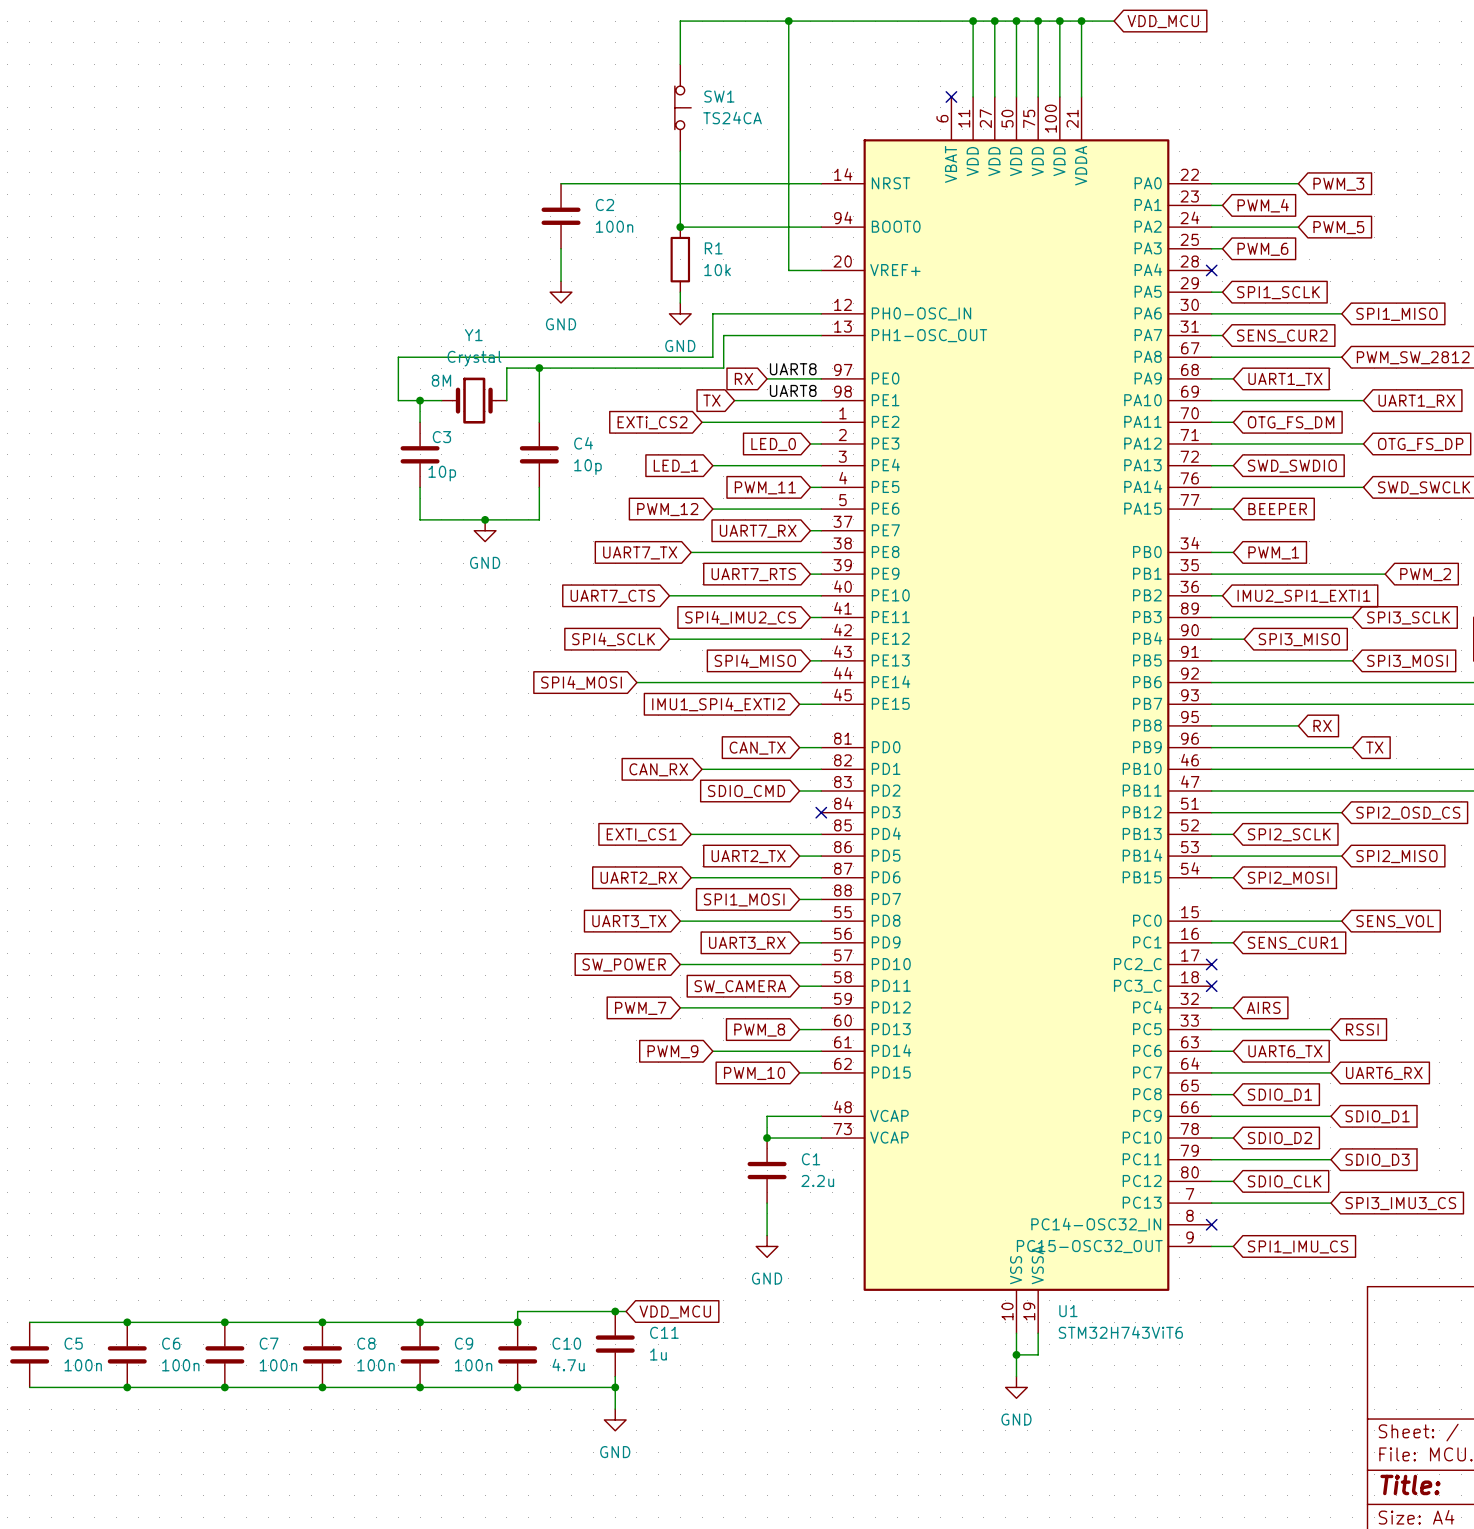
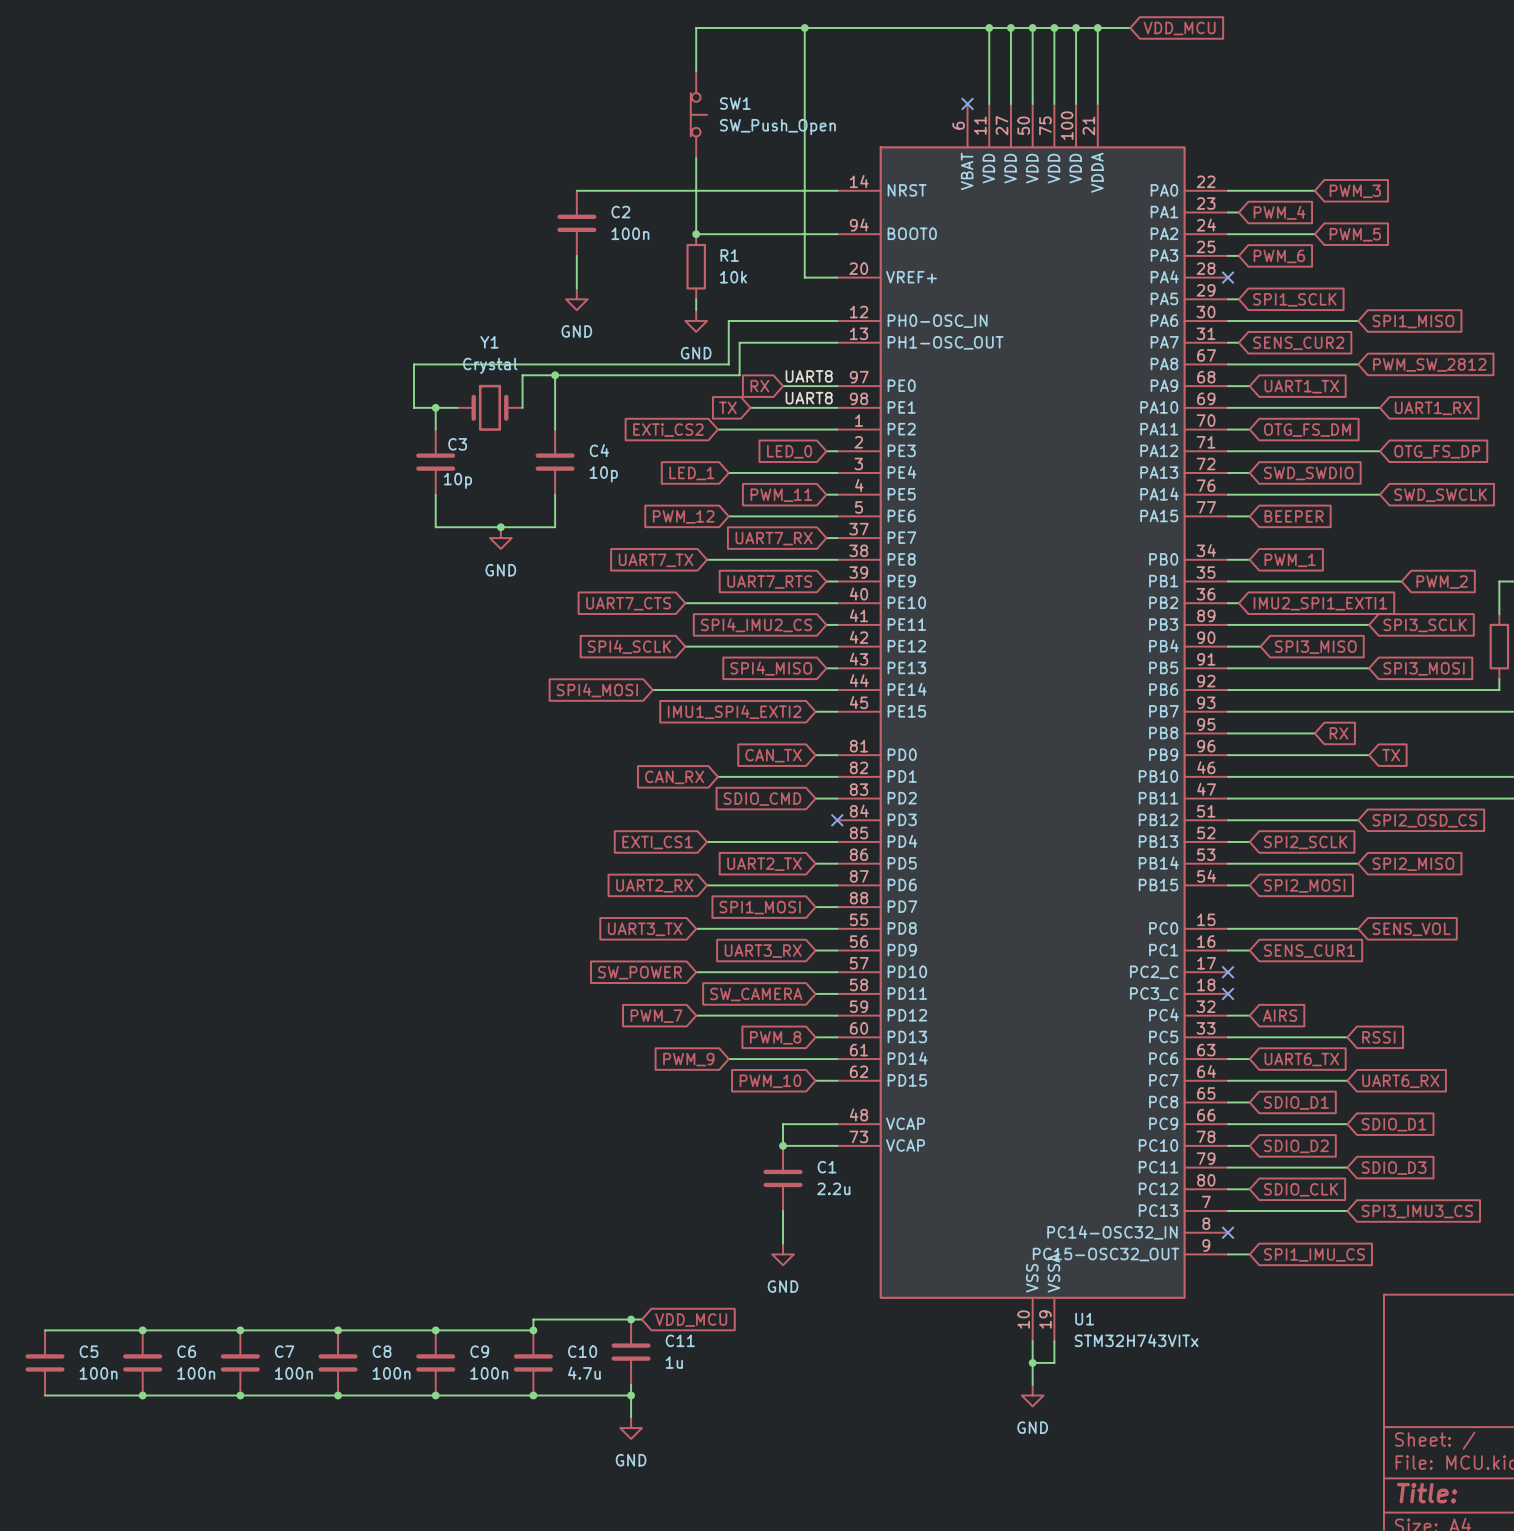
SW1 value: TS24CA (732, 118) -> SW_Push_Open (777, 127)
Y1 text: 8M (441, 380) -> none
U1 value: STM32H743ViT6 (1120, 1332) -> STM32H743VITx (1136, 1340)

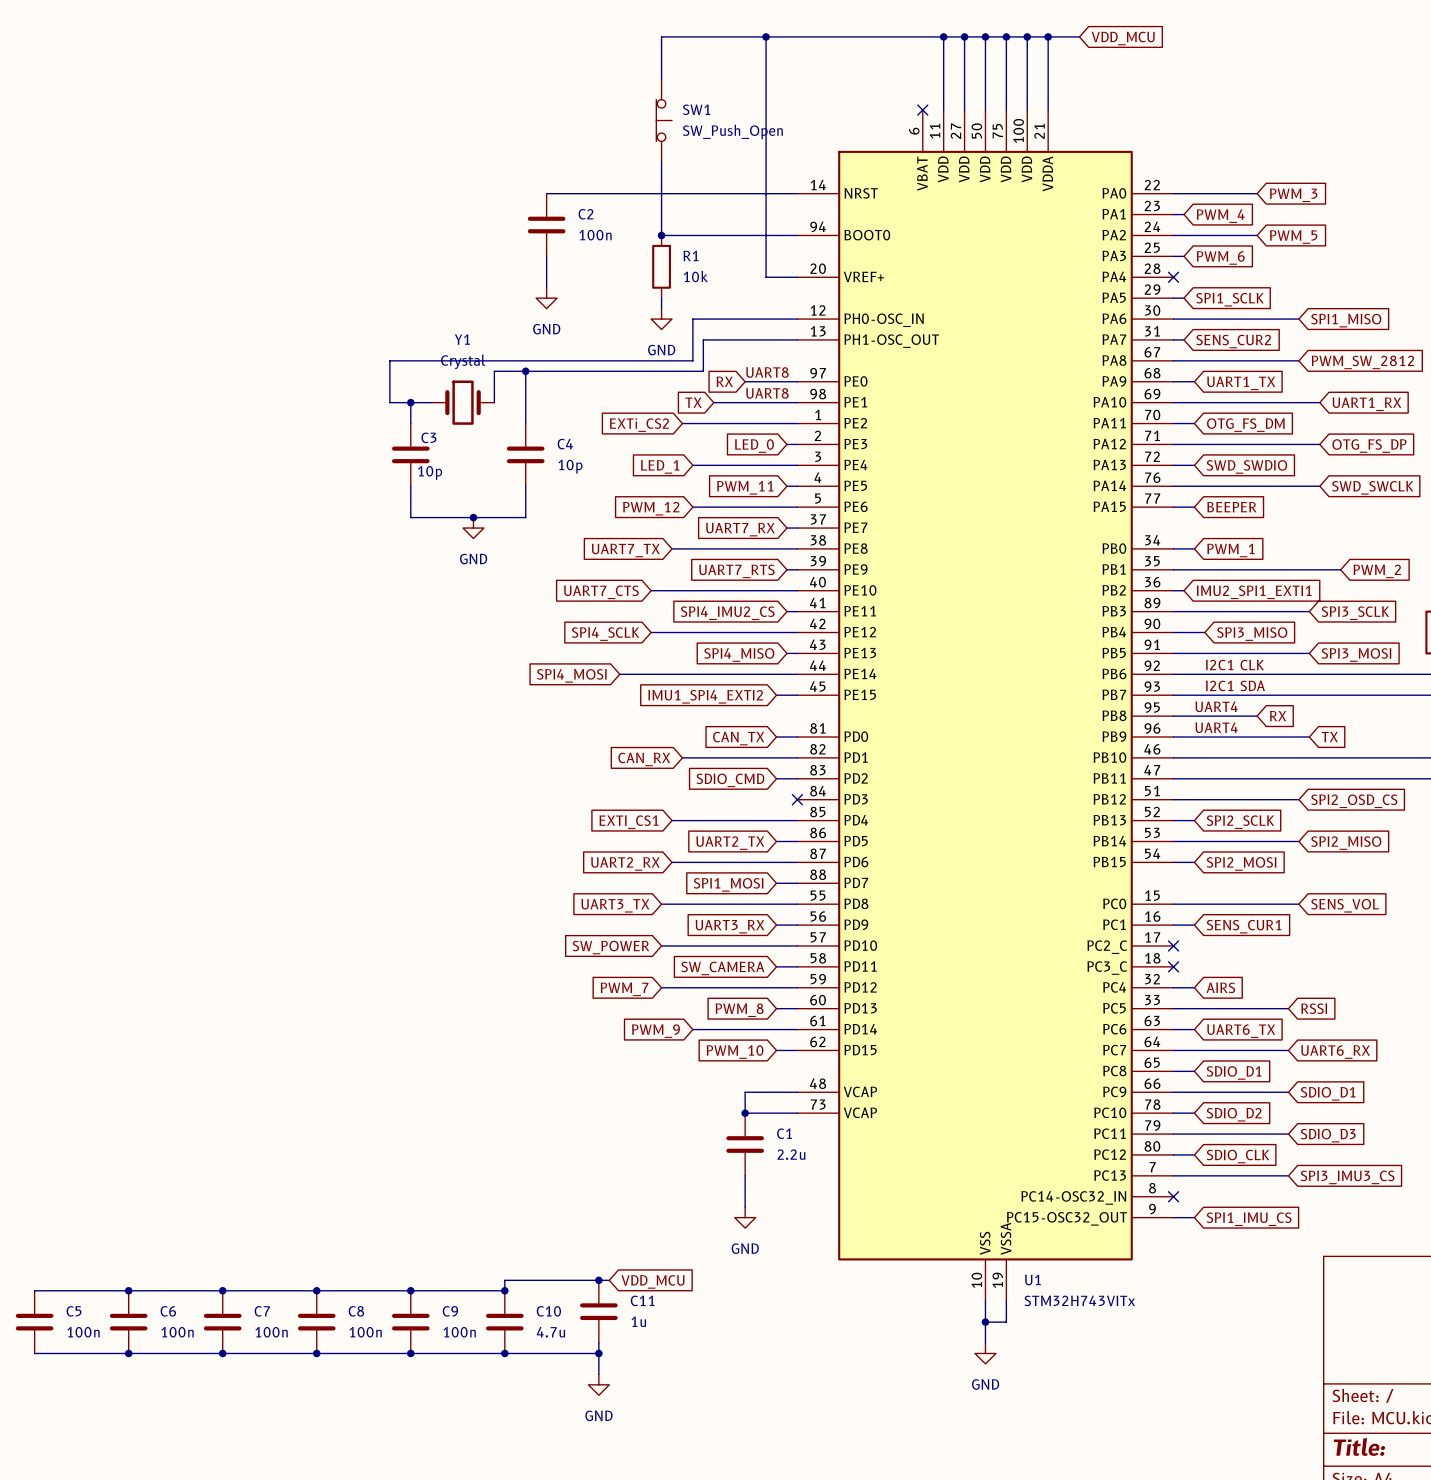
label: none -> I2C1 CLK (1234, 665)
label: none -> I2C1 SDA (1235, 685)
label: none -> UART4 (1216, 706)
label: none -> UART4 (1216, 727)

